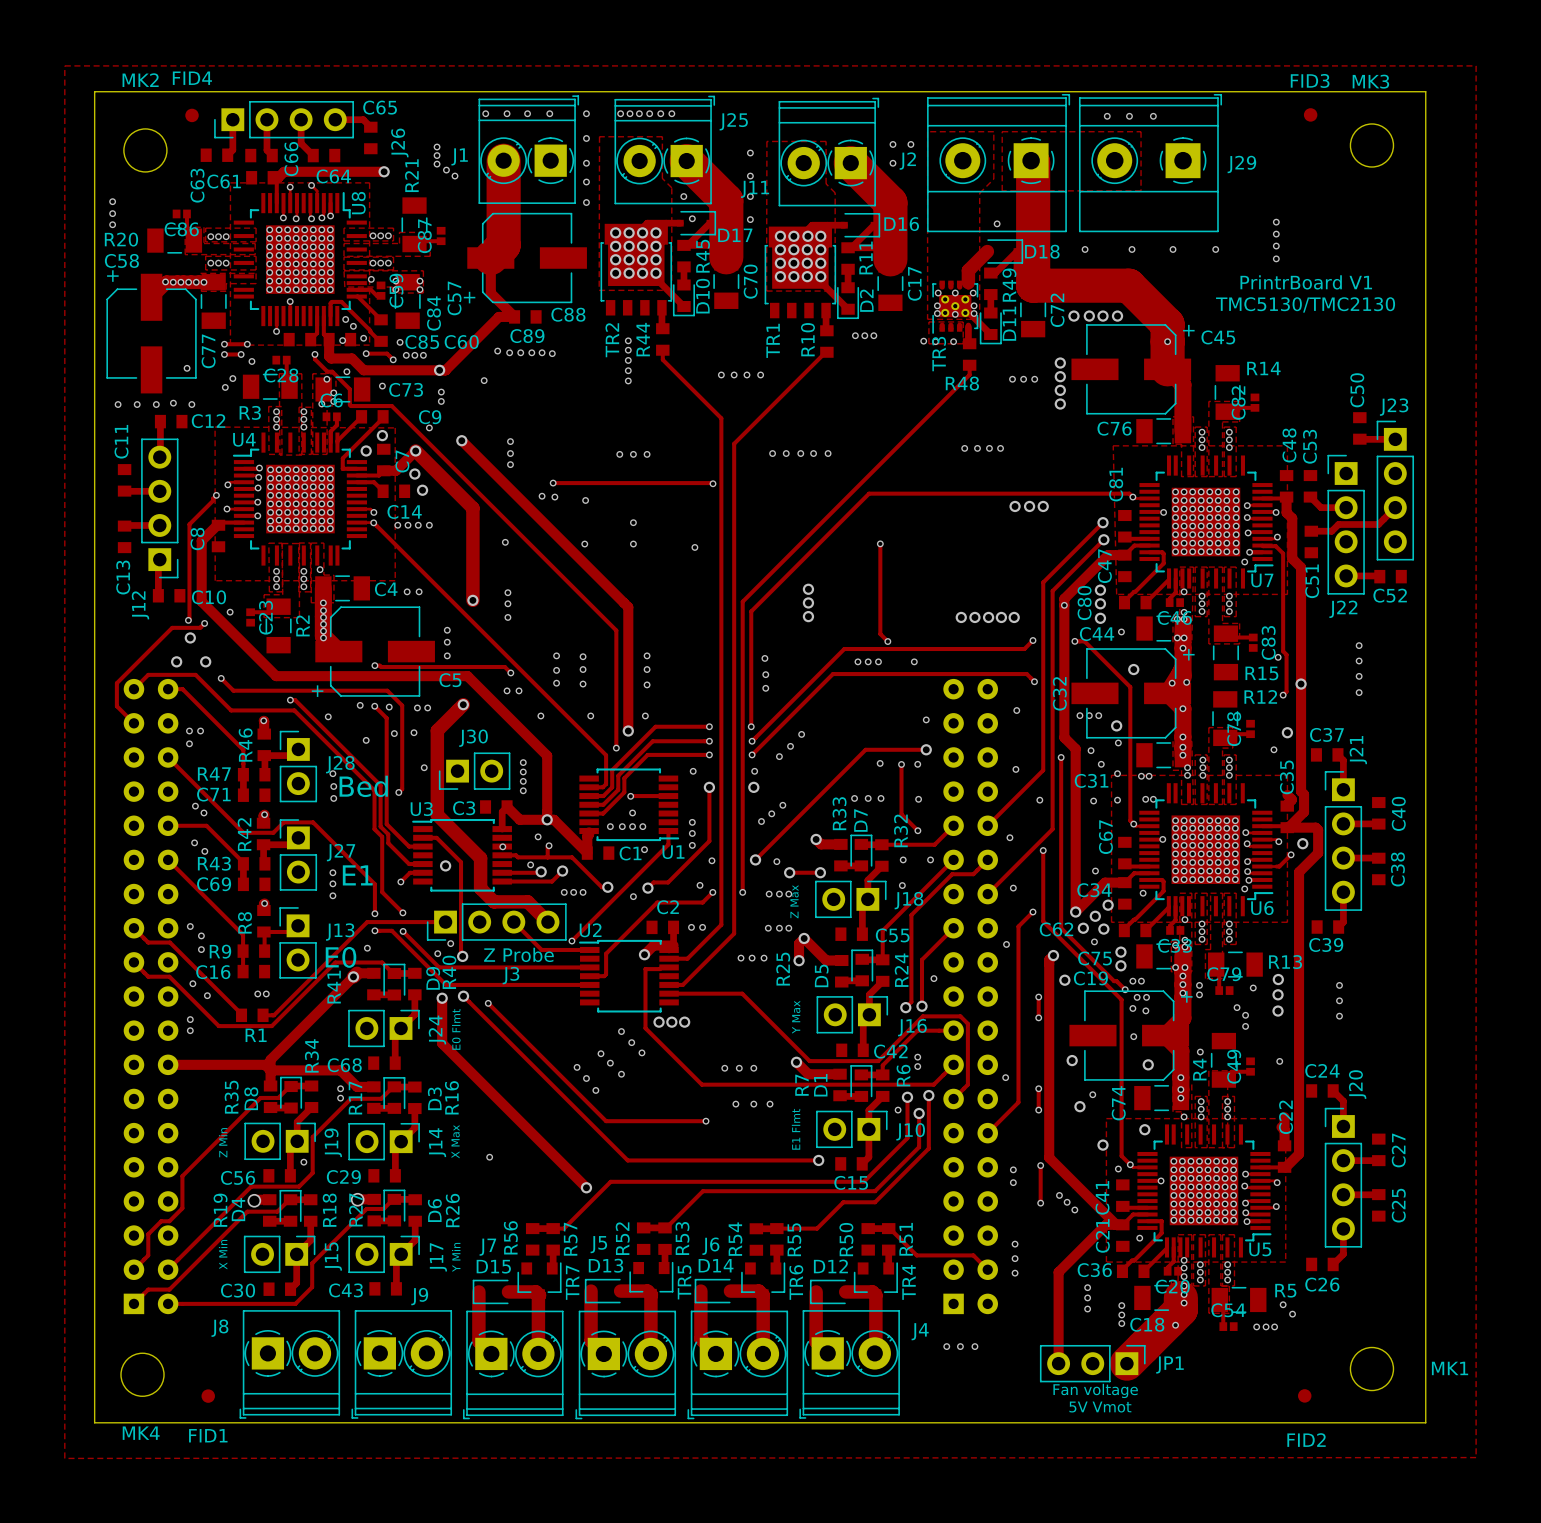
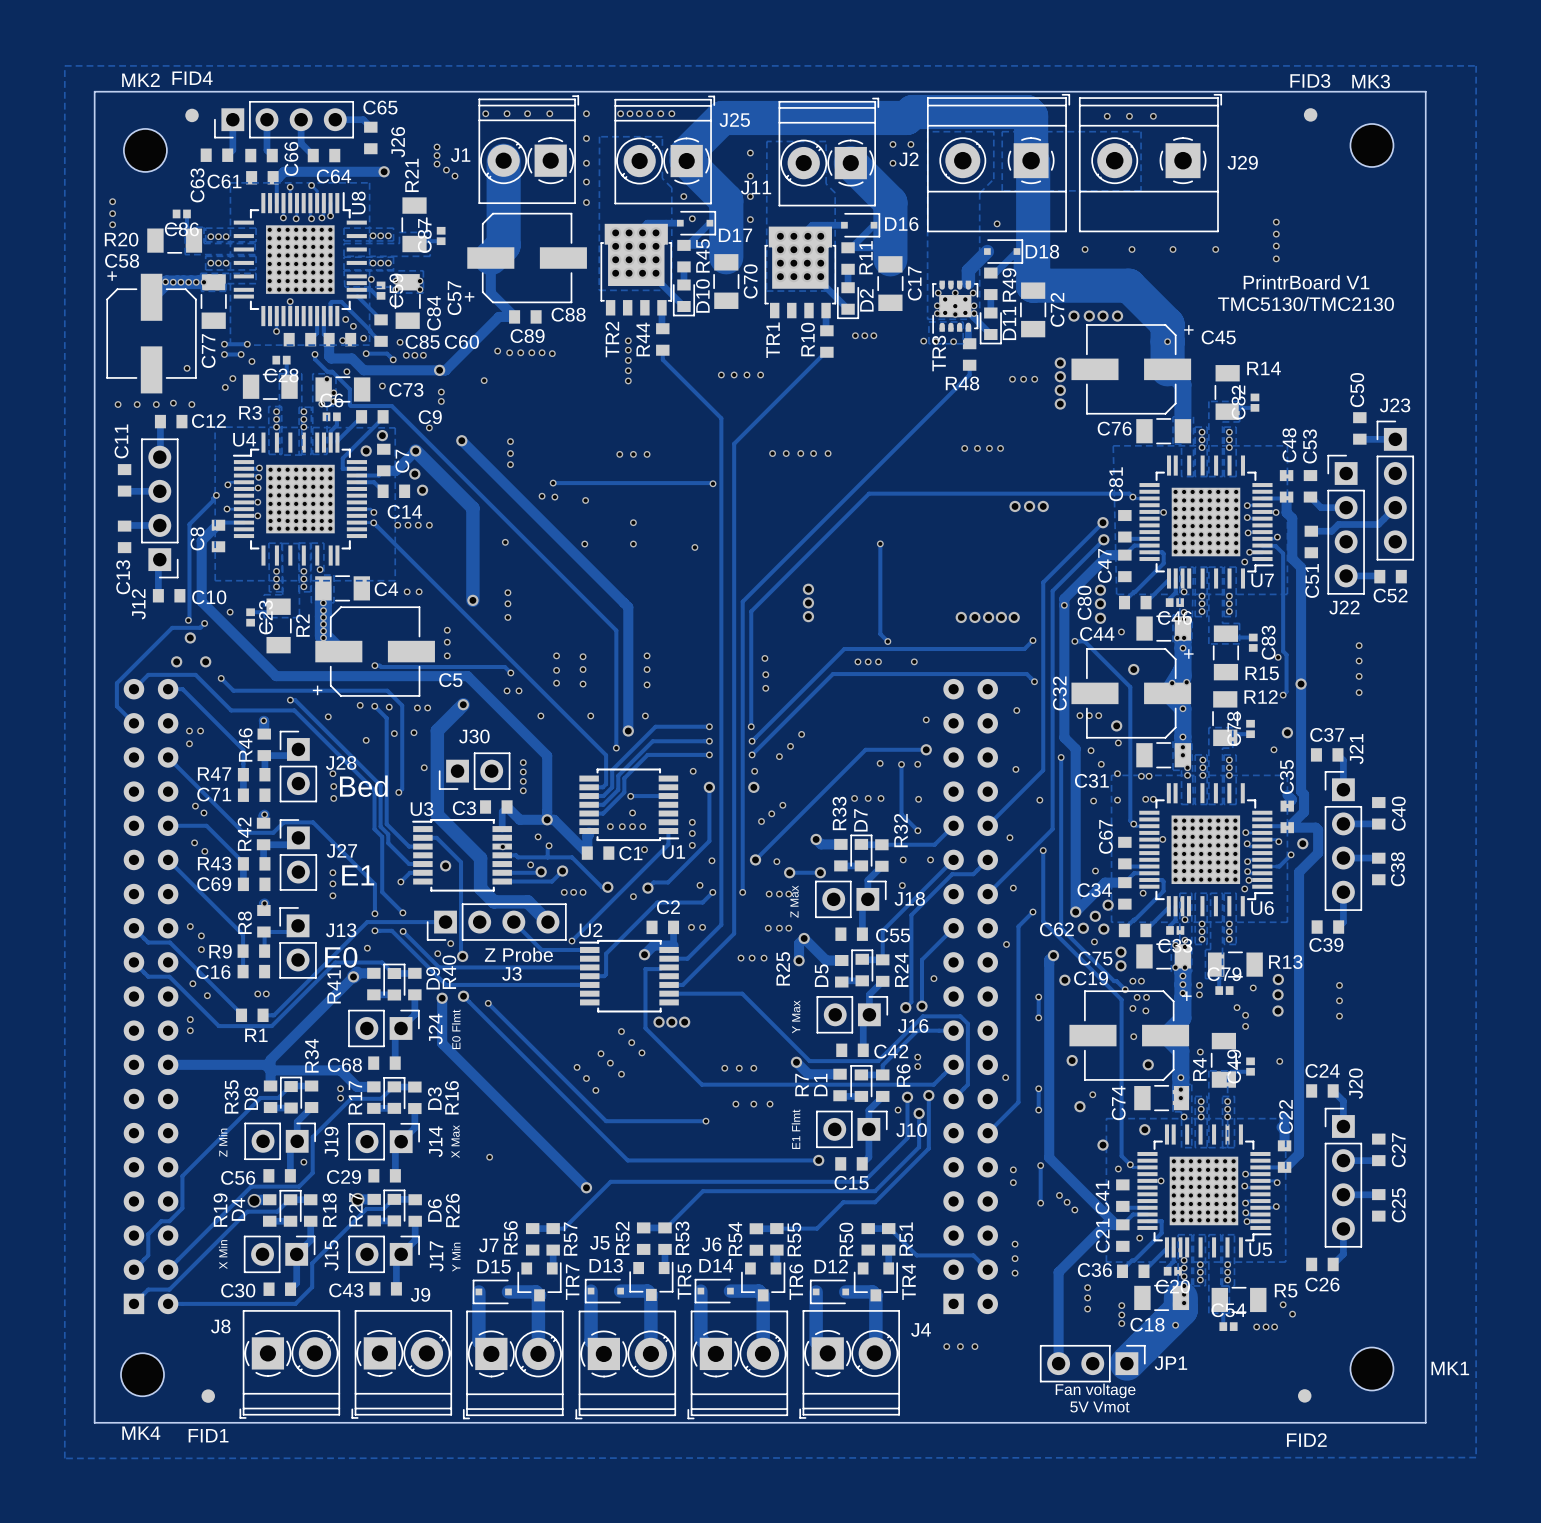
track: none -> (1031, 160) (1031, 116) (1027, 112) (912, 112) (906, 118) (722, 118) (686, 153) (686, 161)

